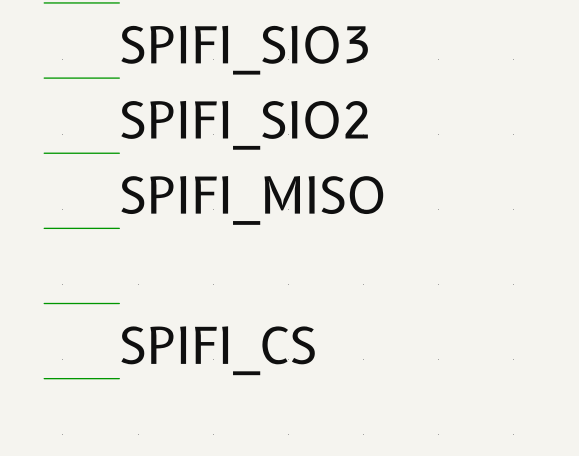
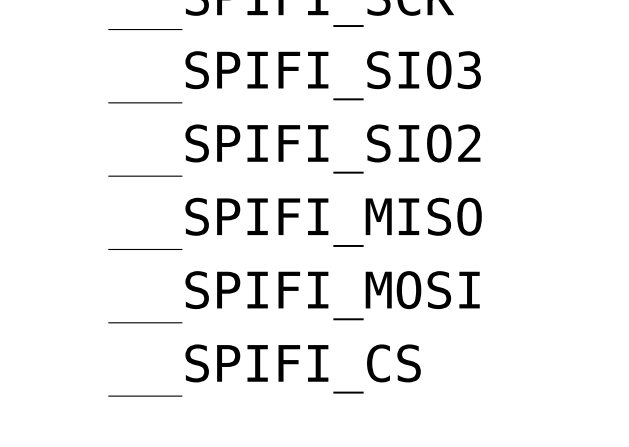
label: none -> SPIFI_MOSI (332, 295)

